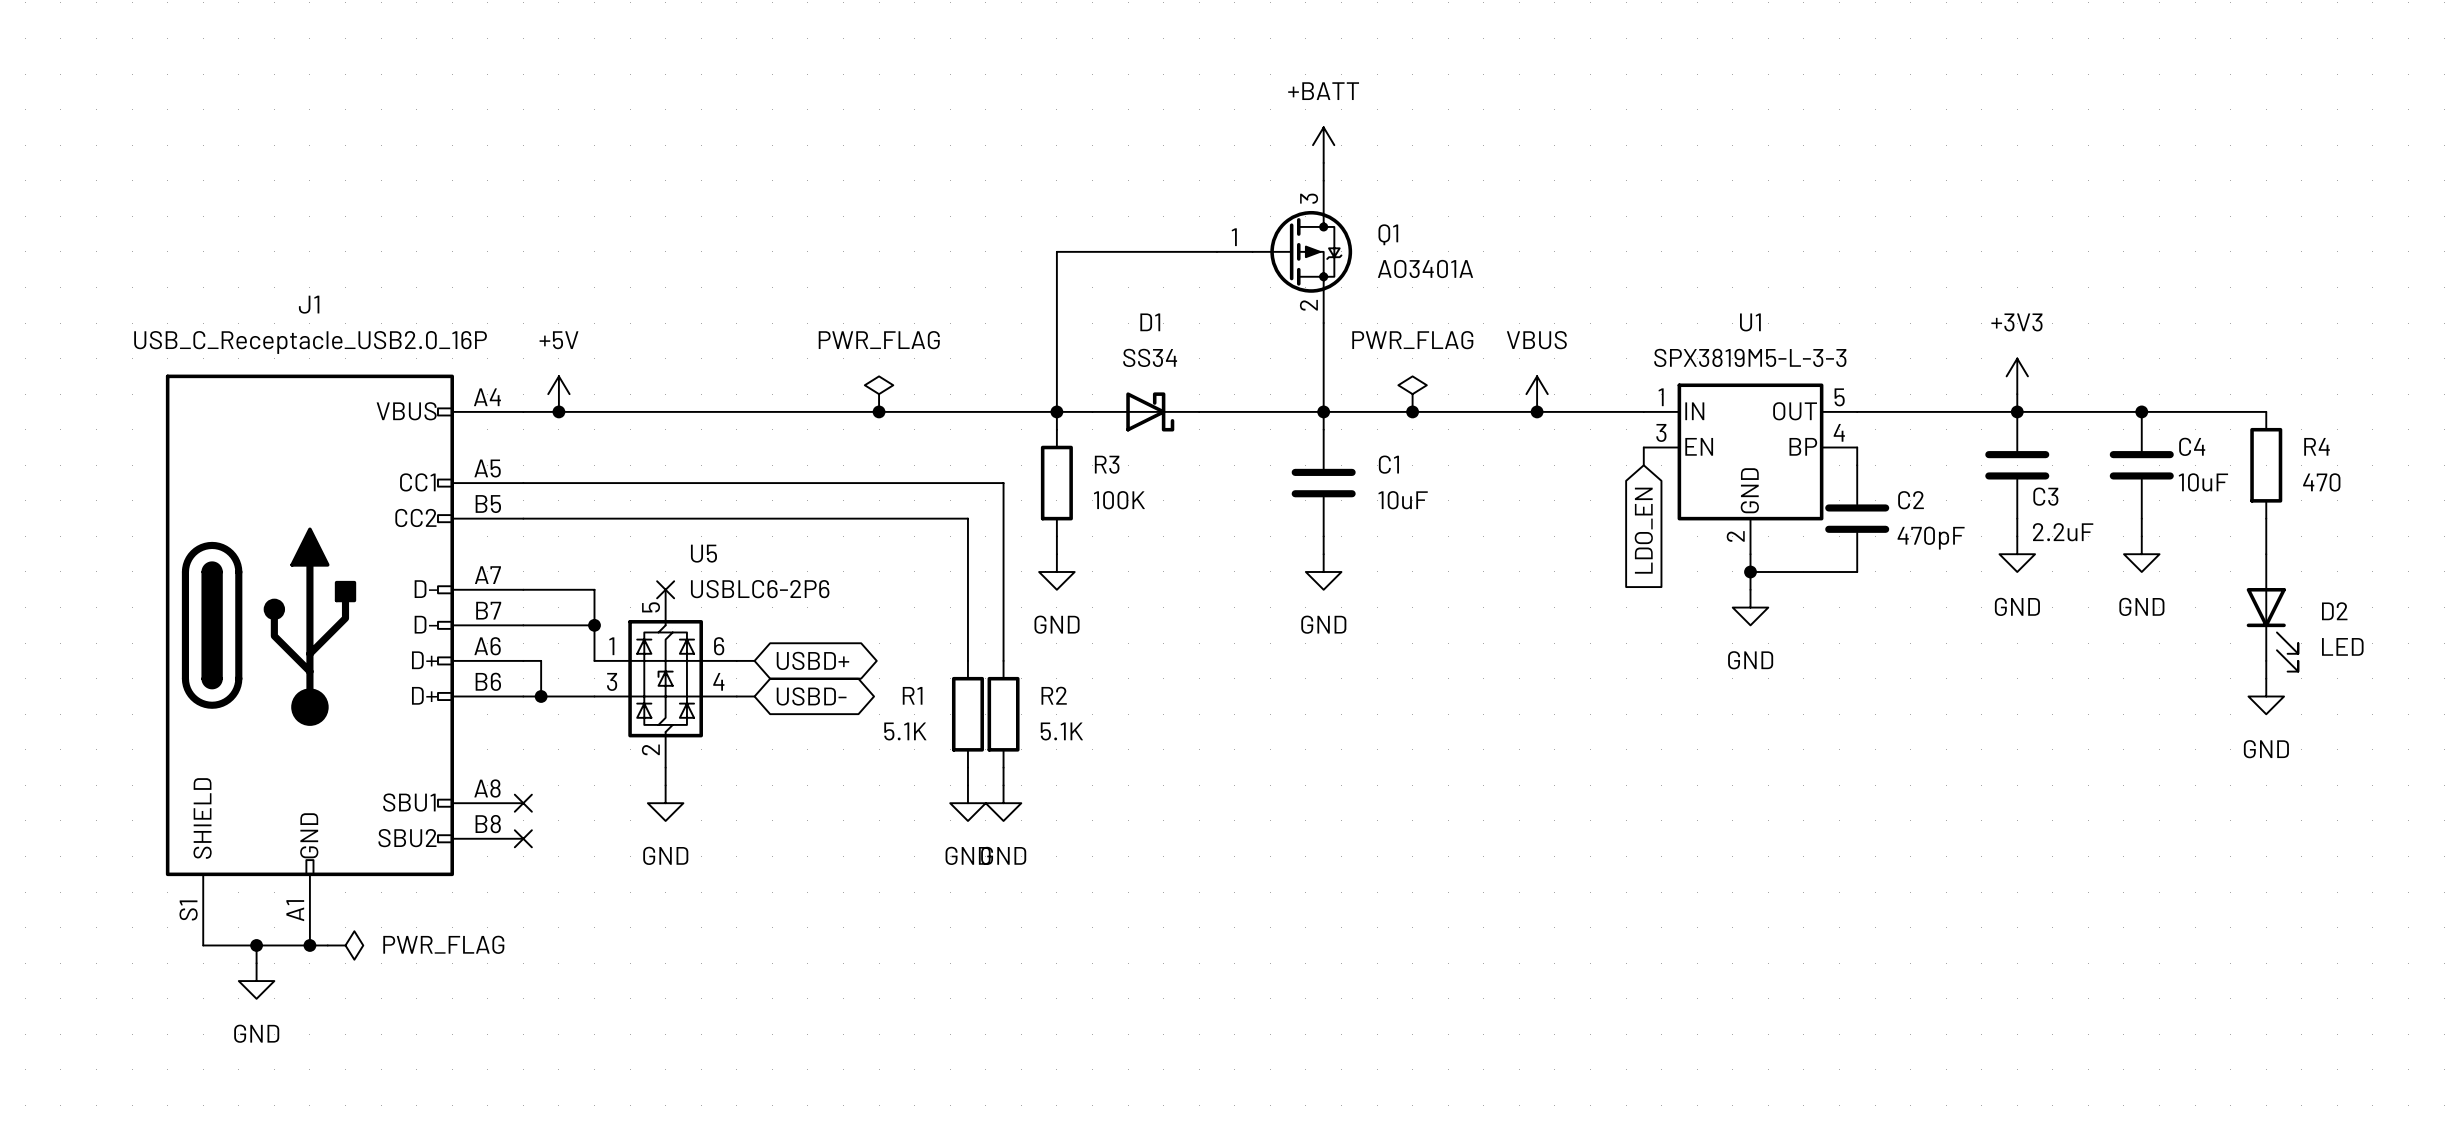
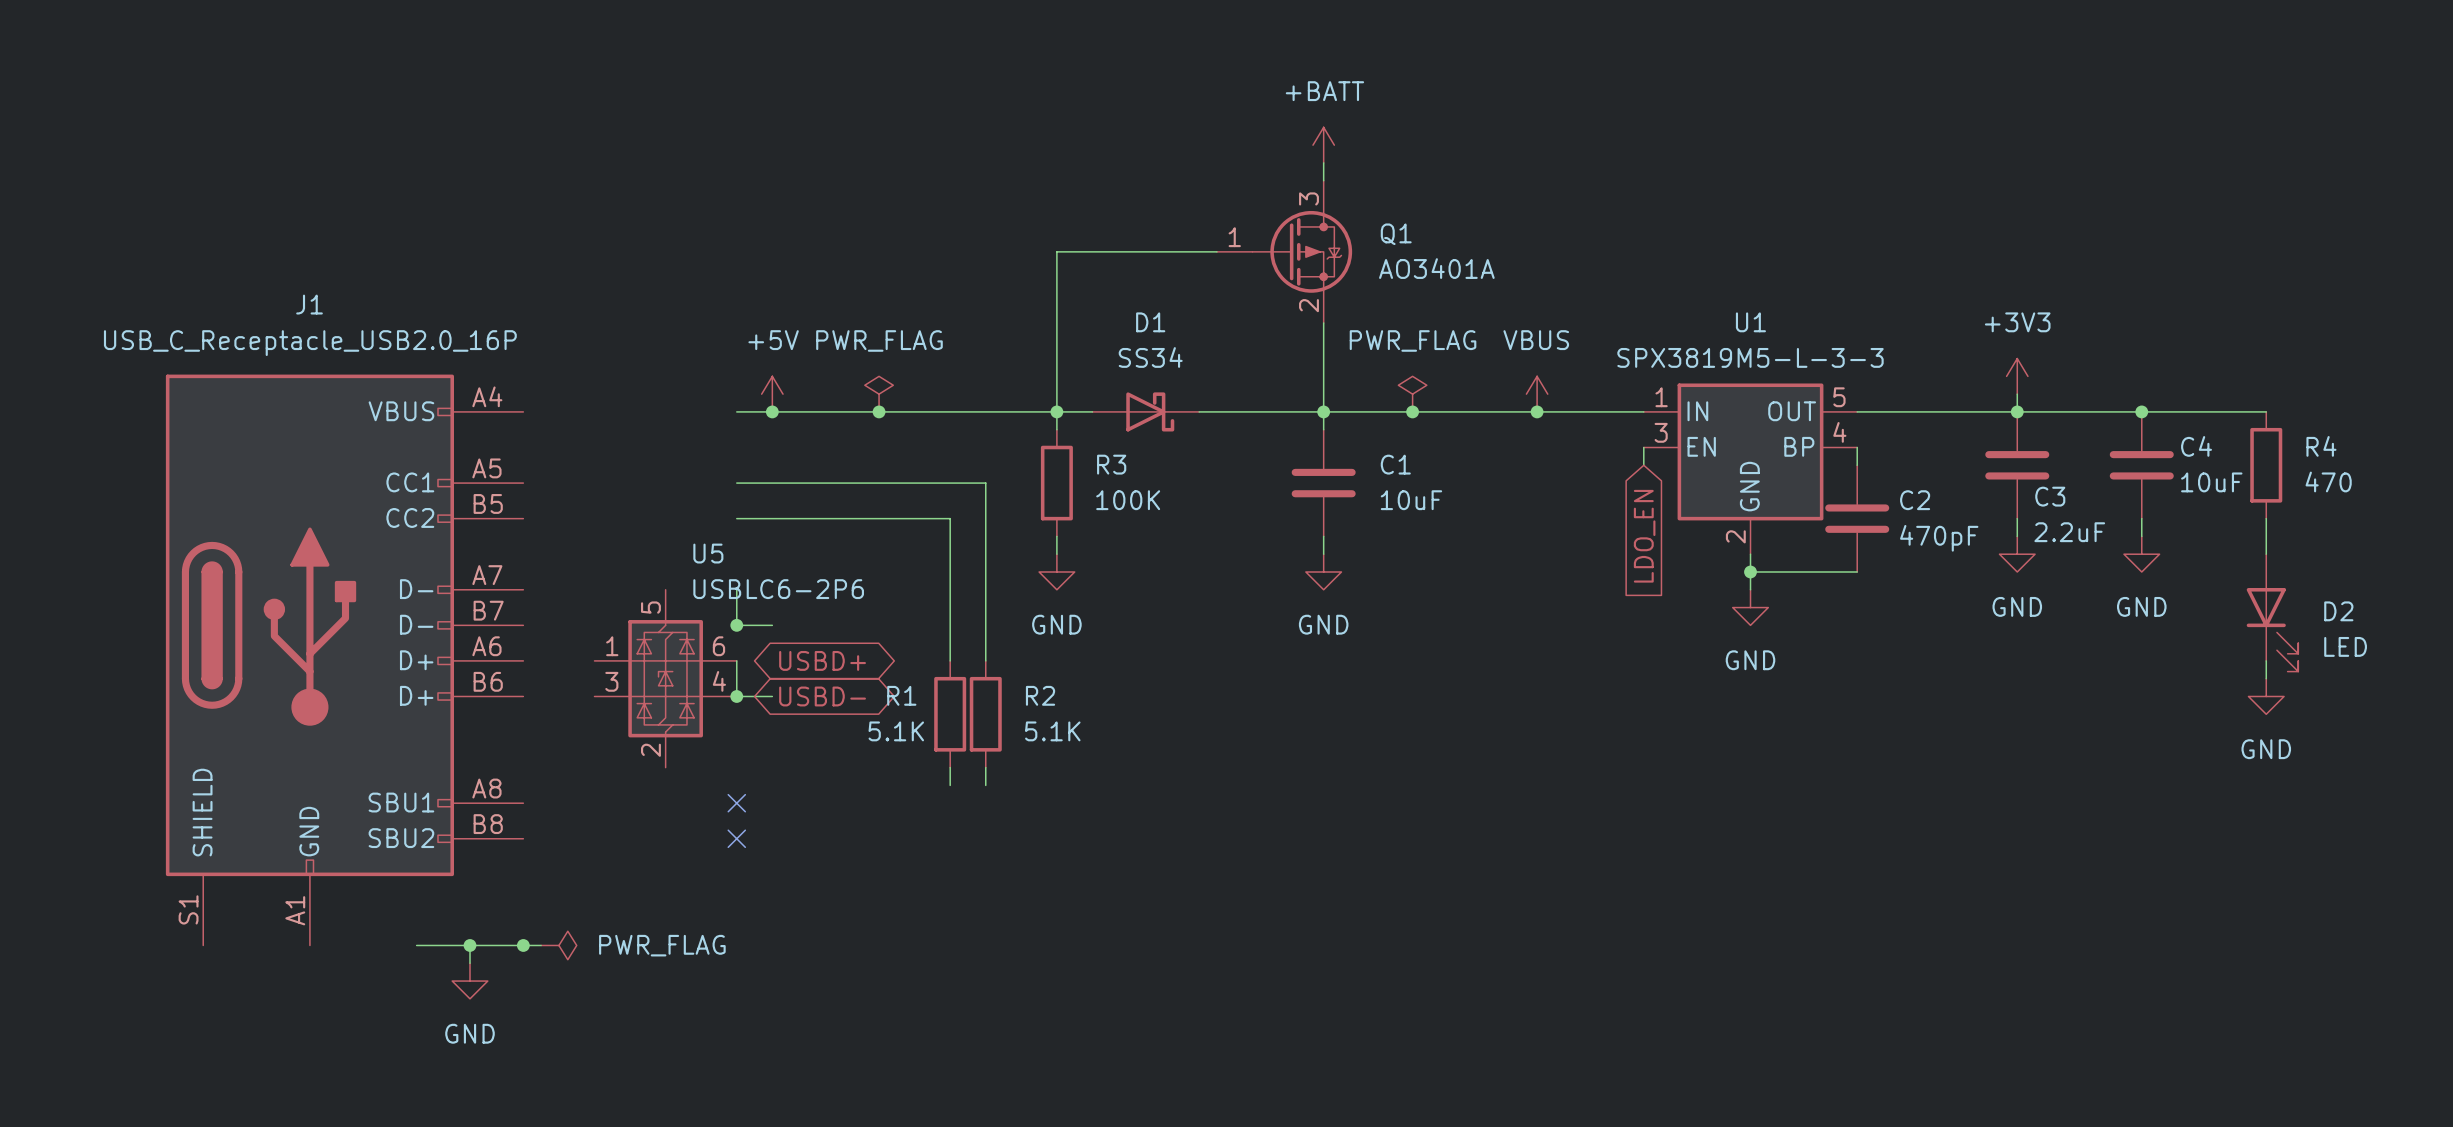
power symbol position: +5V (558, 394) -> +5V (772, 394)
wire: (523, 411) (736, 411) -> none
junction: (558, 411) -> none
junction: none -> (772, 411)
wire: (523, 483) (736, 483) -> none
wire: (985, 483) (1003, 483) (1003, 660) -> (985, 483) (985, 660)
wire: (523, 518) (736, 518) -> none
wire: (950, 518) (967, 518) (967, 660) -> (950, 518) (950, 660)
wire: (523, 589) (594, 589) (594, 660) -> none
no-connect mark: (665, 589) -> none
wire: none -> (736, 589) (736, 625) (772, 625)
wire: (523, 625) (594, 625) -> none
junction: (594, 625) -> none
junction: none -> (736, 625)
wire: (523, 660) (541, 660) (541, 696) -> none
wire: (736, 660) (754, 660) -> (736, 660) (736, 696)
wire: (523, 696) (594, 696) -> none
junction: (541, 696) -> none
junction: none -> (736, 696)
wire: none -> (754, 696) (772, 696)
R1 position: (967, 714) -> (950, 714)
R2 position: (1003, 714) -> (985, 714)
wire: (665, 767) (665, 785) -> none
wire: (967, 767) (967, 785) -> (950, 767) (950, 785)
wire: (1003, 767) (1003, 785) -> (985, 767) (985, 785)
no-connect mark: (523, 803) -> none
power symbol: GND (665, 803) -> none
no-connect mark: none -> (736, 803)
power symbol: GND (967, 803) -> none
power symbol: GND (1003, 803) -> none
no-connect mark: (523, 838) -> none
no-connect mark: none -> (736, 838)
wire: (203, 945) (327, 945) -> (416, 945) (541, 945)
wire: (256, 945) (256, 963) -> (470, 945) (470, 963)
junction: (256, 945) -> none
junction: (309, 945) -> none
power symbol position: PWR_FLAG (345, 945) -> PWR_FLAG (558, 945)
junction: none -> (470, 945)
junction: none -> (523, 945)
power symbol: GND (256, 981) -> none
power symbol: none -> GND (470, 981)

